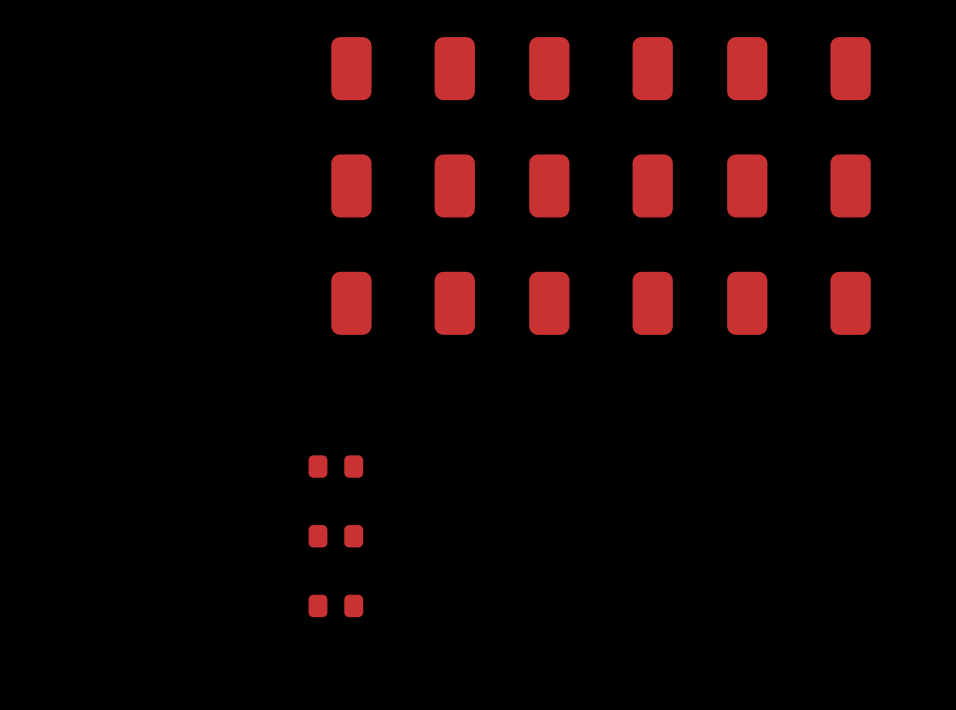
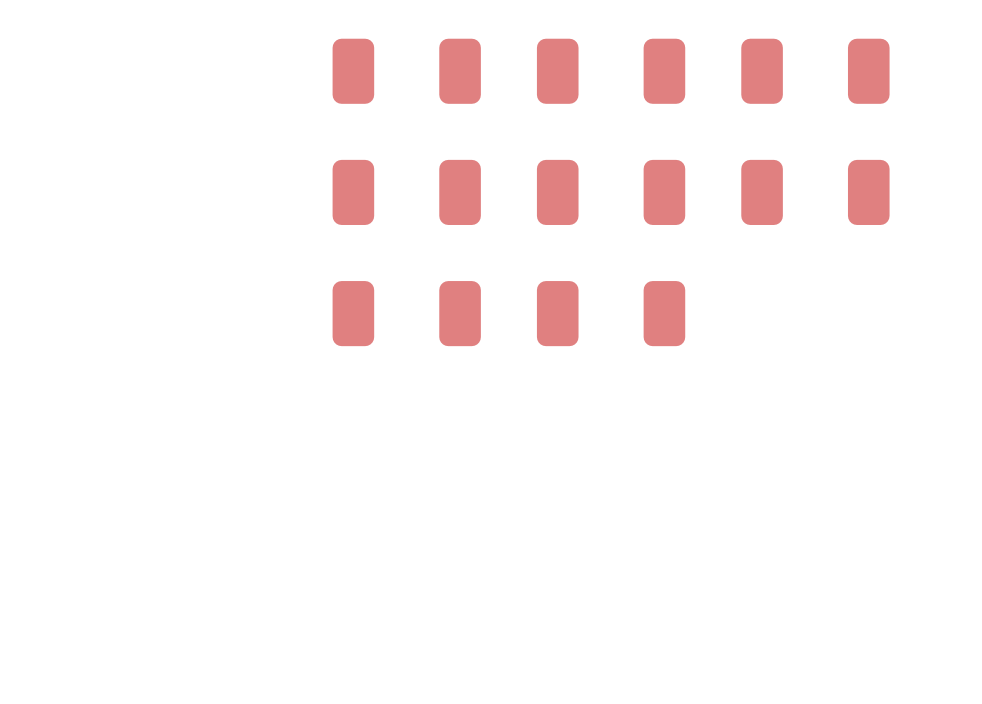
part: (798, 303) -> none
part: (335, 466) -> none
part: (335, 536) -> none
part: (335, 605) -> none

